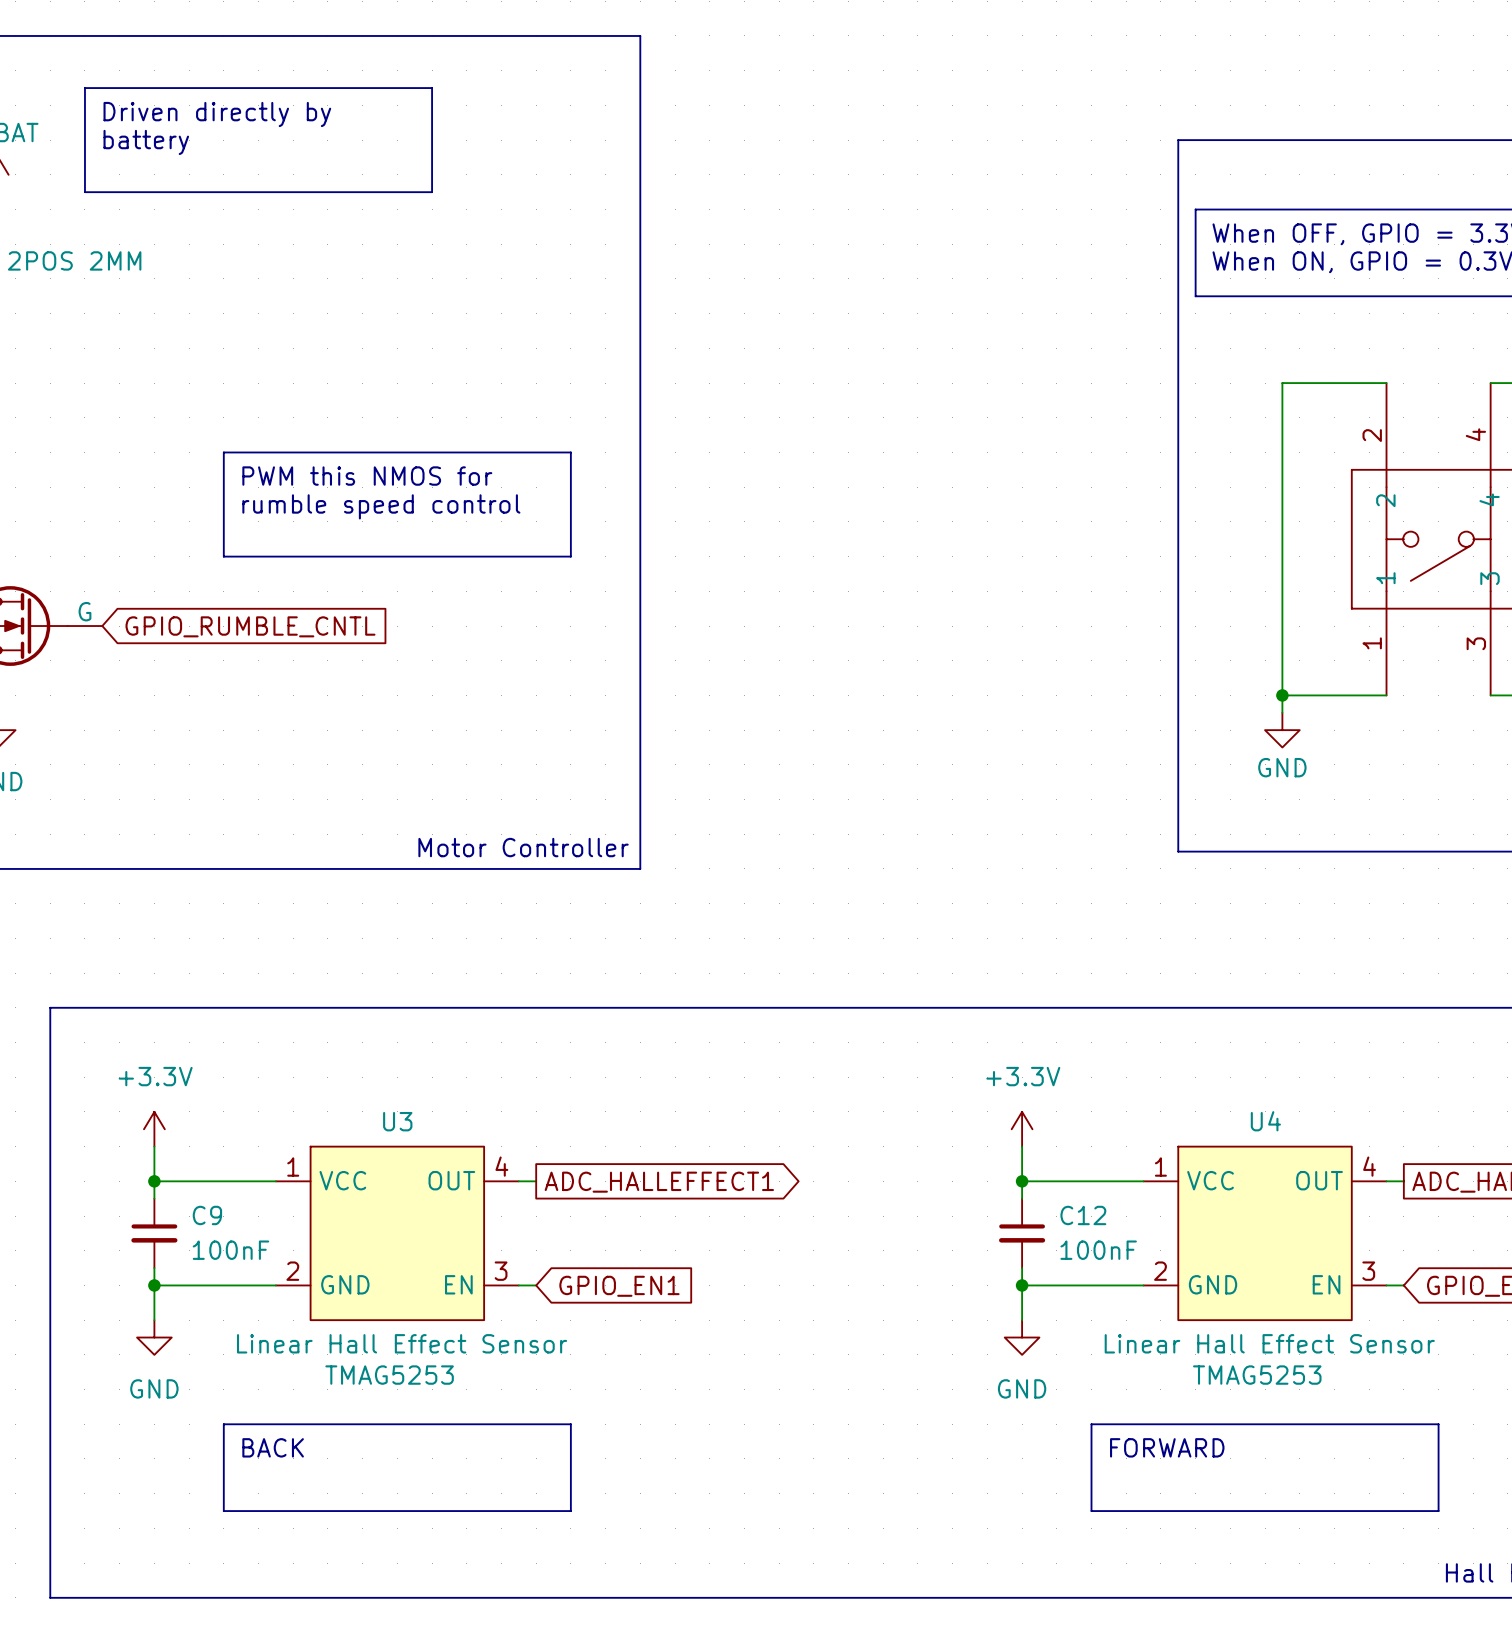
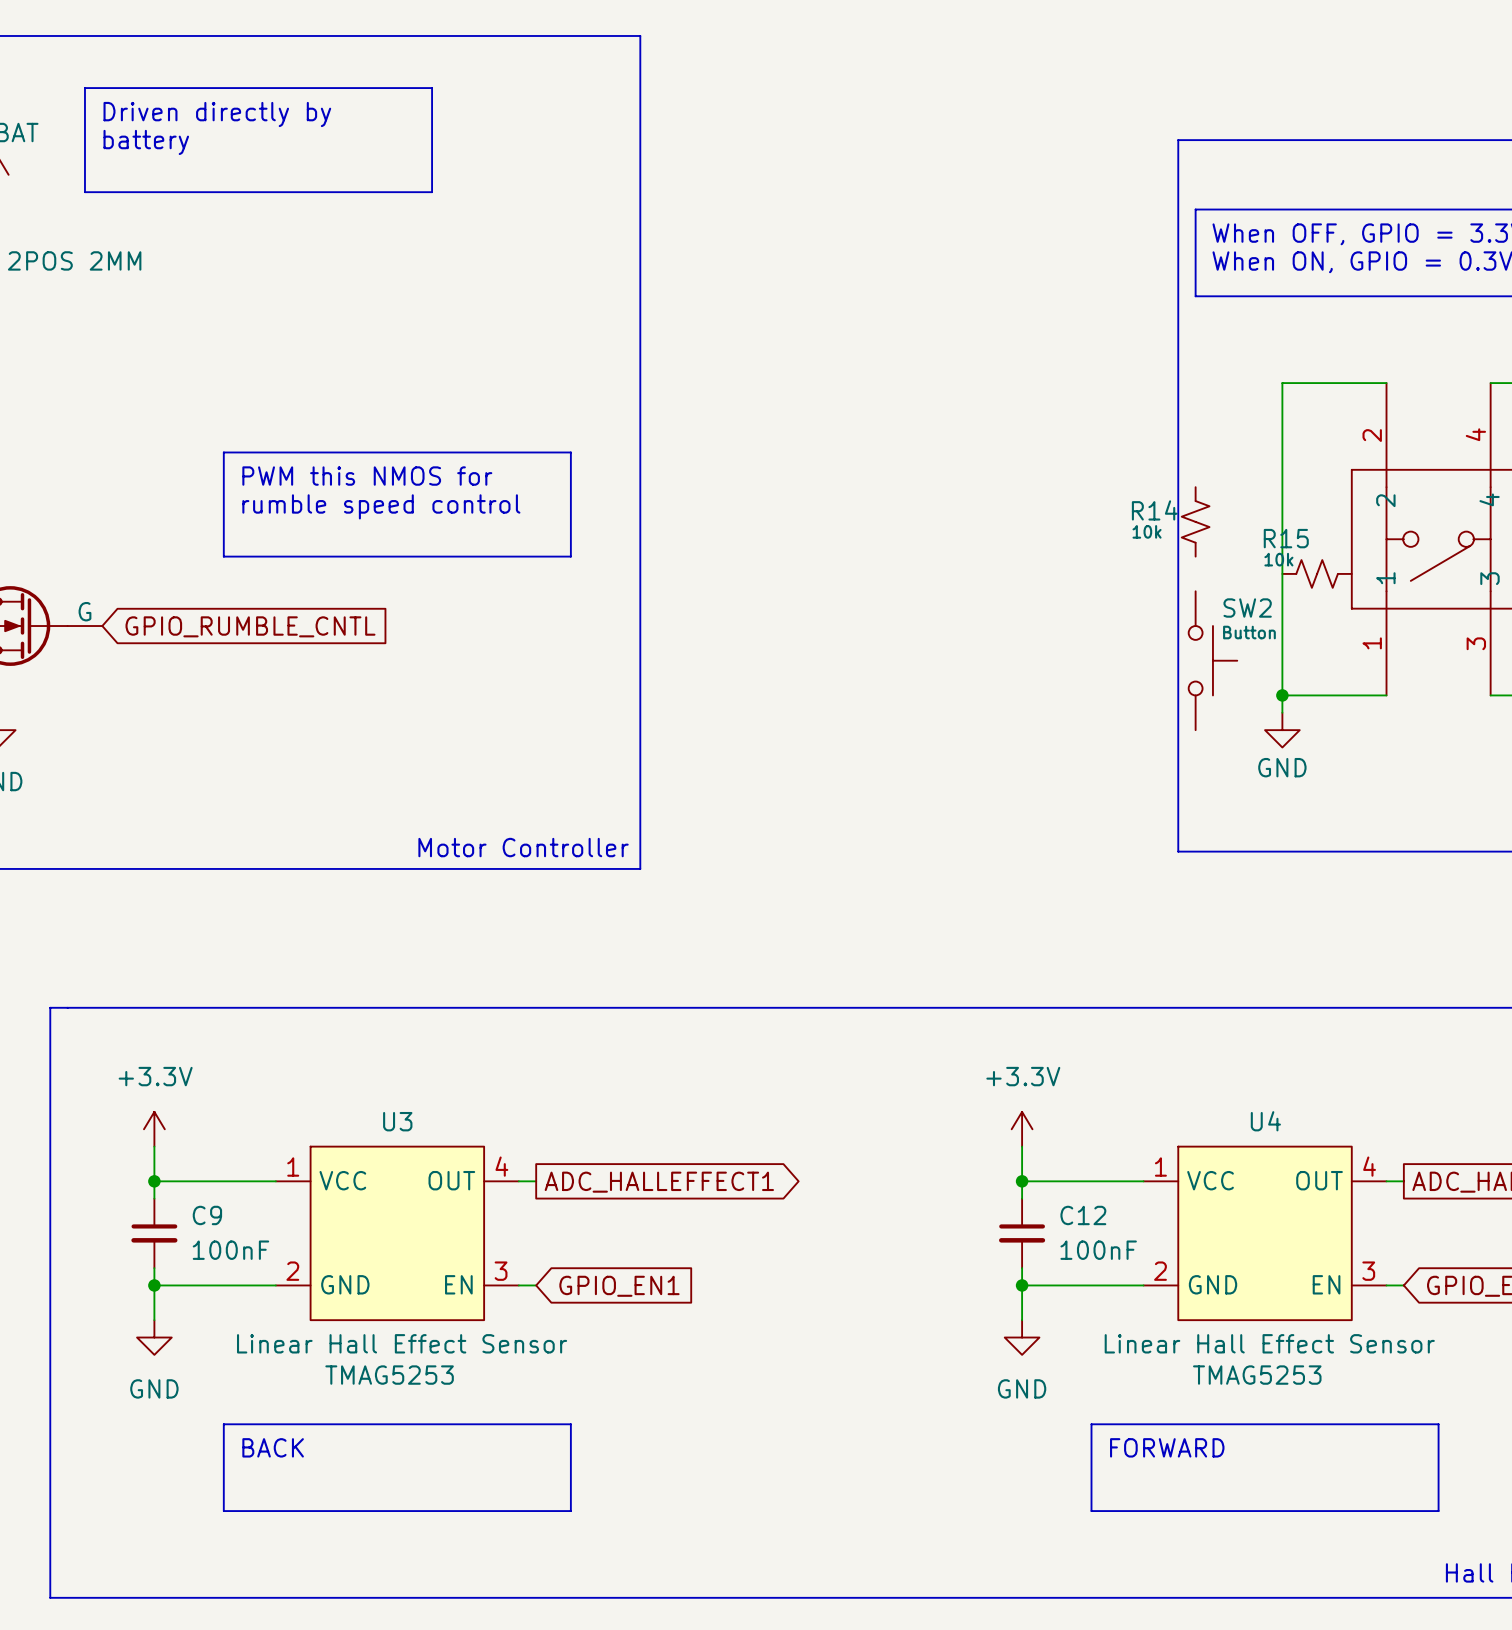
R14: none -> 10k (1195, 521)
R15: none -> 10k (1317, 573)
SW2: none -> Button (1212, 660)

